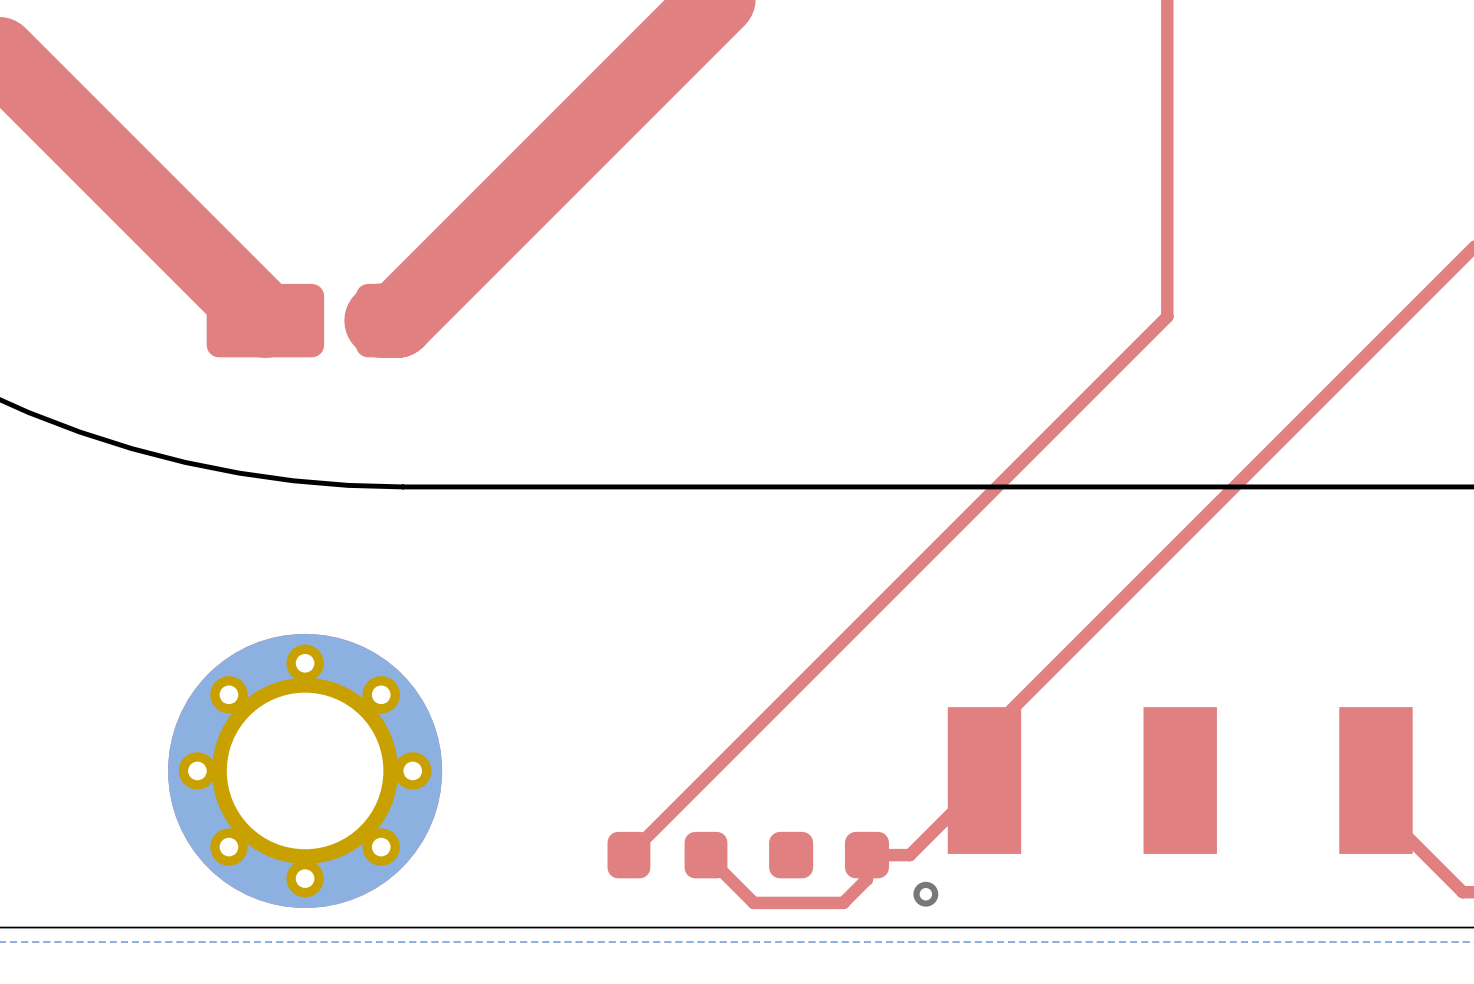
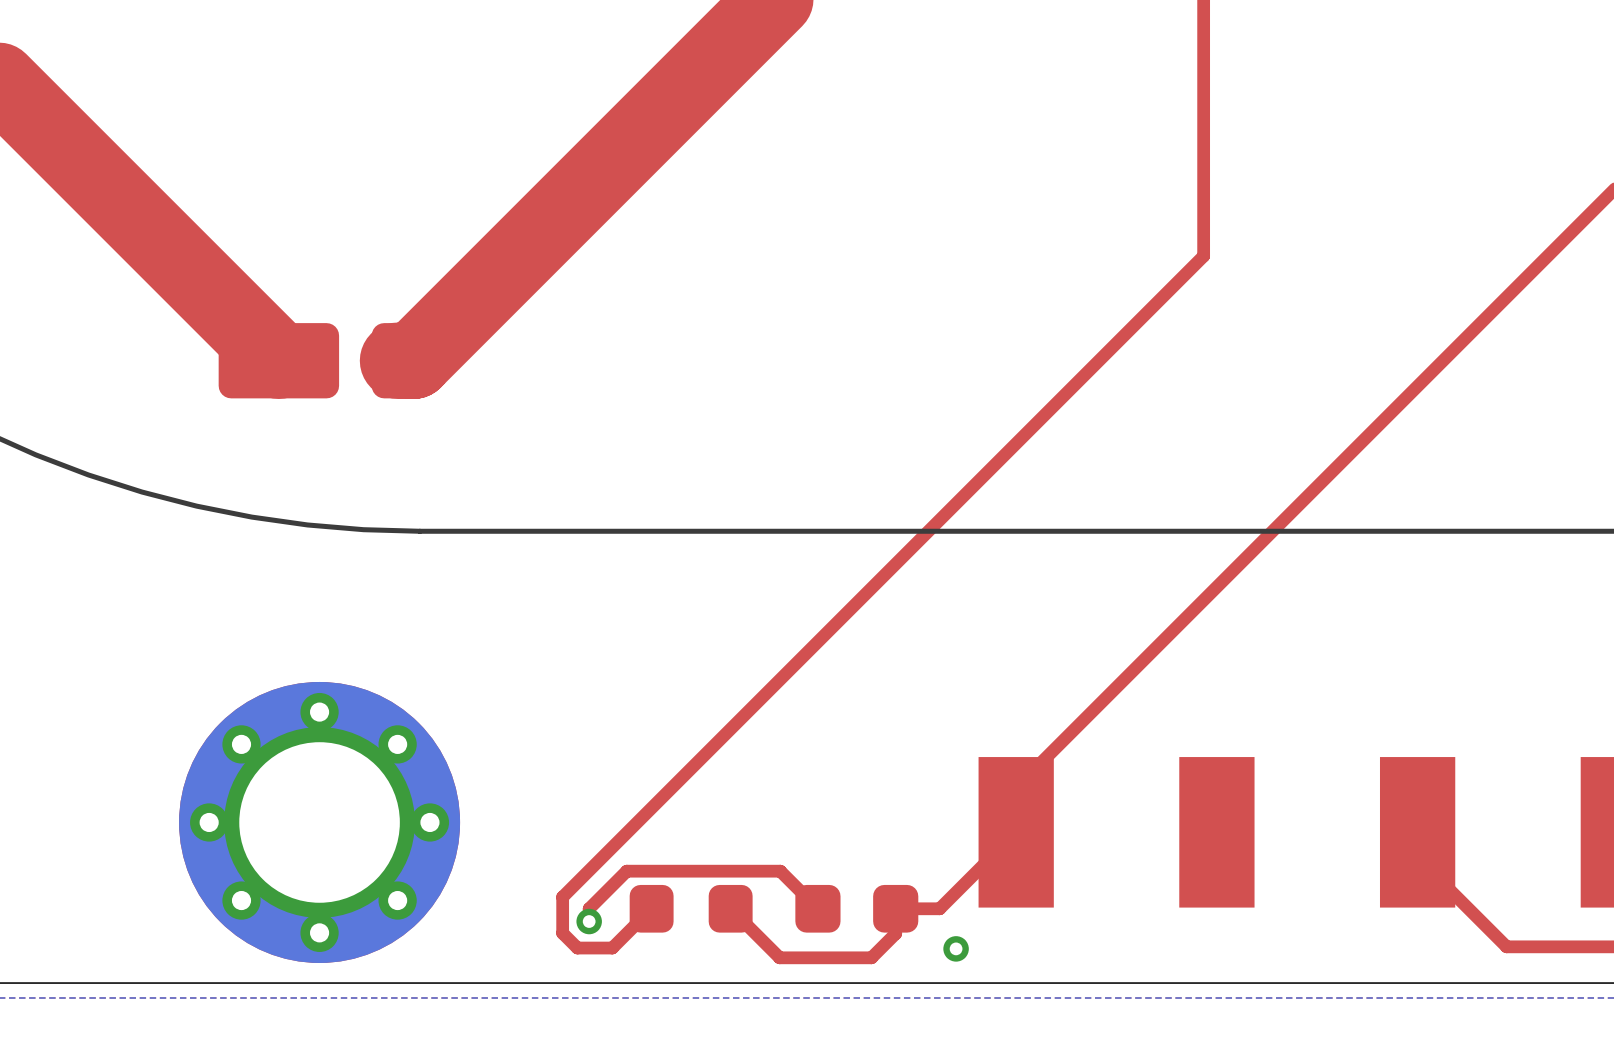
top track: (1167, 218) (1167, 316) (628, 855) -> (1203, 256) (562, 897) (562, 933) (577, 948) (612, 948) (651, 908)
top track: none -> (817, 908) (780, 871) (626, 871) (589, 908) (589, 921)
via: none -> (589, 921)

